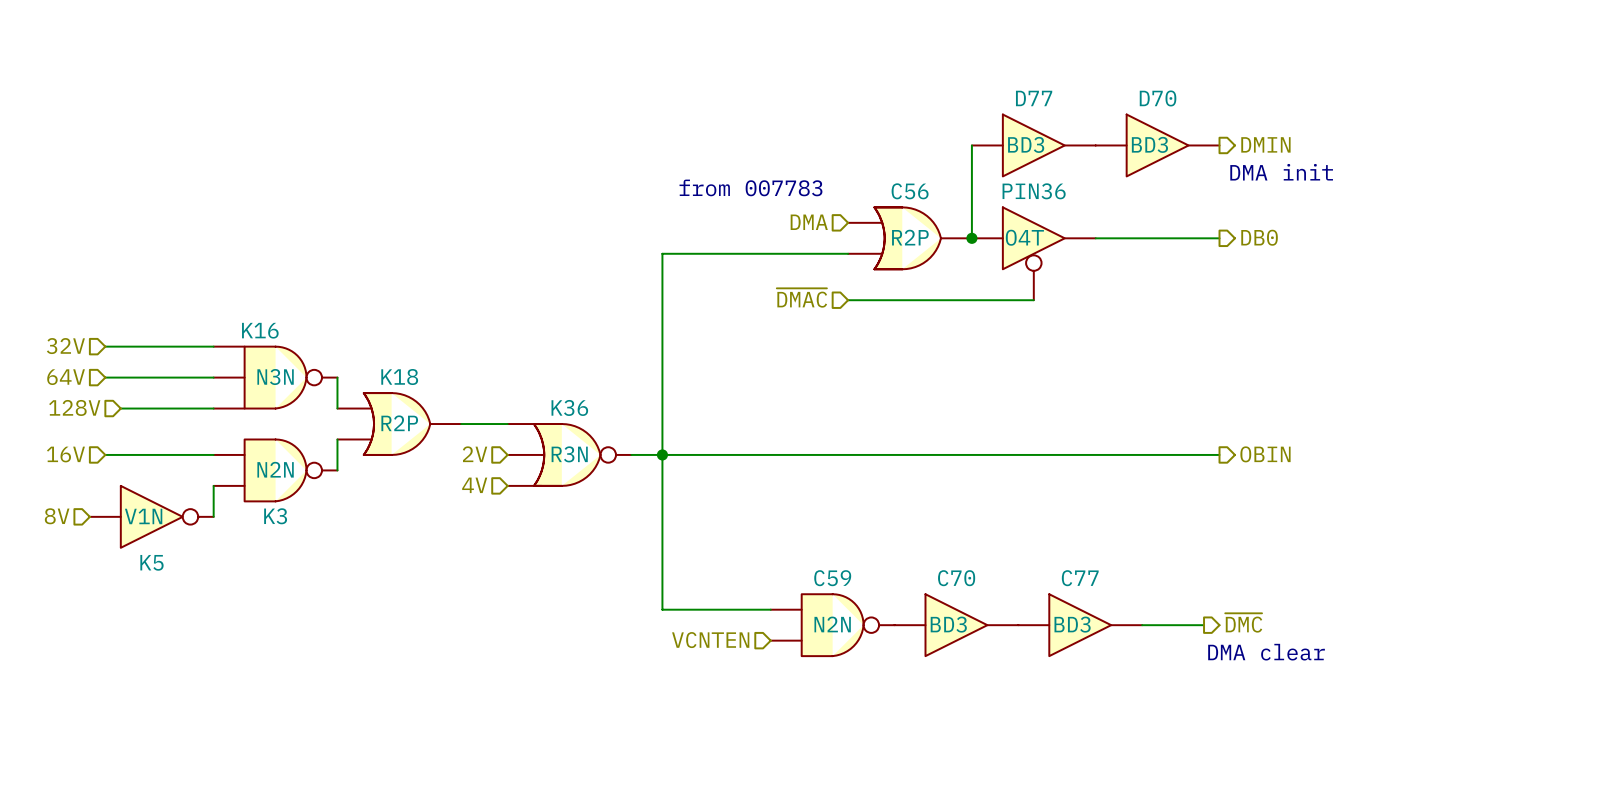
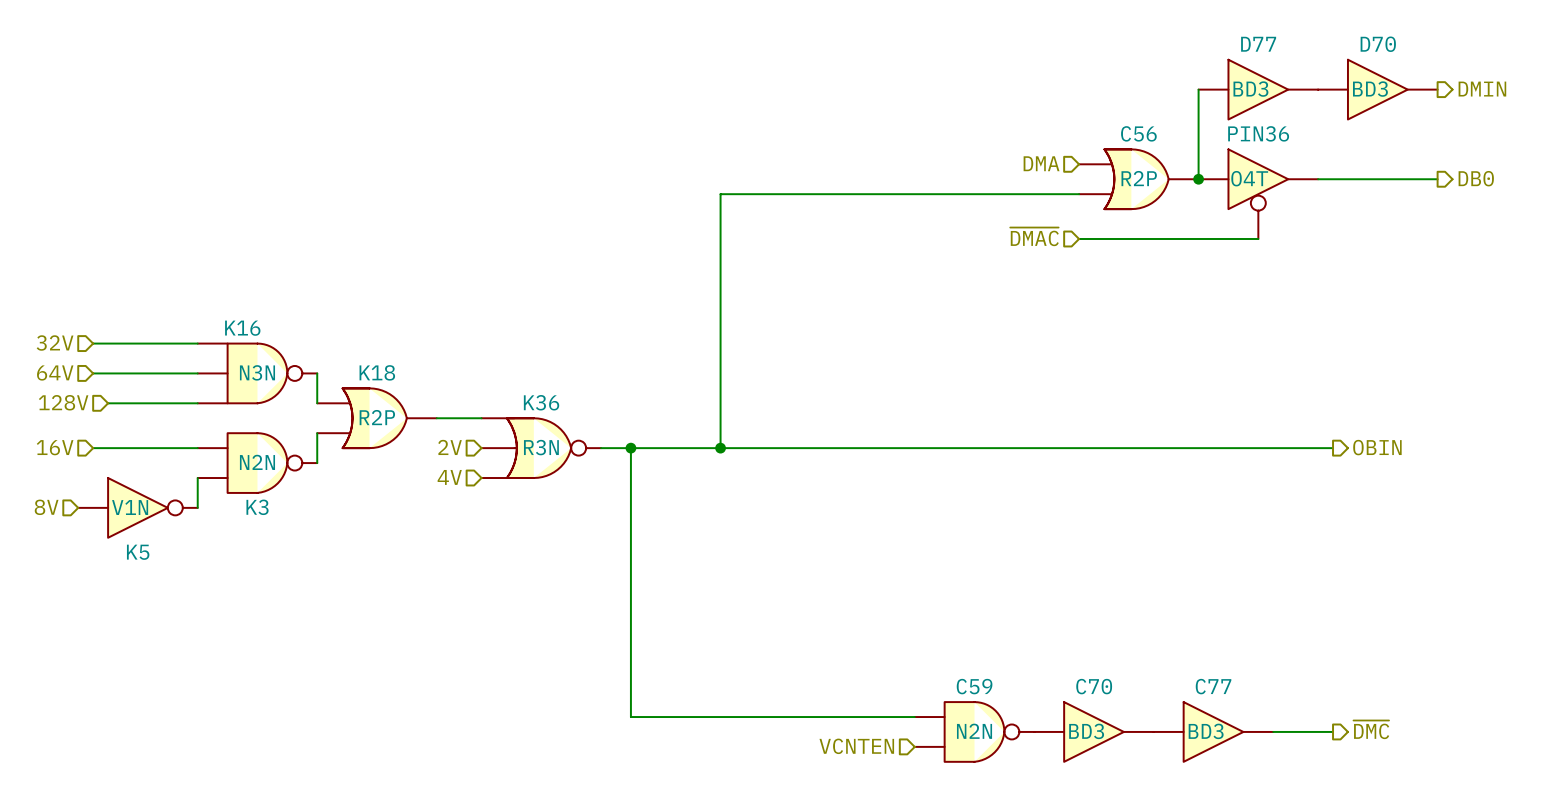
hierarchical label position: DMIN (1265, 144) -> DMIN (1482, 89)
wire: (971, 145) (971, 238) -> (1198, 89) (1198, 179)
D77 position: (1033, 145) -> (1258, 89)
D70 position: (1157, 145) -> (1377, 89)
text: DMA init (1281, 172) -> none
junction: none -> (1198, 179)
wire: none -> (1318, 179) (1437, 179)
text: from 007783 (750, 187) -> none
wire: none -> (1079, 194) (720, 194) (720, 448)
hierarchical label position: DMA (809, 222) -> DMA (1041, 163)
hierarchical label position: DB0 (1259, 237) -> DB0 (1476, 178)
C56 position: (910, 238) -> (1138, 179)
junction: (971, 238) -> none
wire: (1095, 238) (1126, 238) -> none
wire: none -> (1168, 238) (1258, 238)
wire: (848, 253) (662, 253) (662, 454) -> none
PIN36 position: (1033, 253) -> (1258, 194)
hierarchical label position: ~{DMAC} (801, 297) -> ~{DMAC} (1034, 236)
wire: (848, 300) (1033, 300) -> none
junction: none -> (720, 448)
wire: none -> (1168, 448) (1333, 448)
hierarchical label position: OBIN (1265, 454) -> OBIN (1377, 447)
wire: (662, 609) (770, 609) -> (630, 597) (630, 717) (914, 717)
hierarchical label position: ~{DMC} (1243, 622) -> ~{DMC} (1371, 729)
C59 position: (832, 625) -> (974, 731)
C70 position: (956, 625) -> (1094, 731)
C77 position: (1080, 625) -> (1213, 731)
wire: (1142, 625) (1204, 625) -> (1273, 731) (1333, 731)
hierarchical label position: VCNTEN (710, 640) -> VCNTEN (856, 746)
text: DMA clear (1266, 652) -> none

